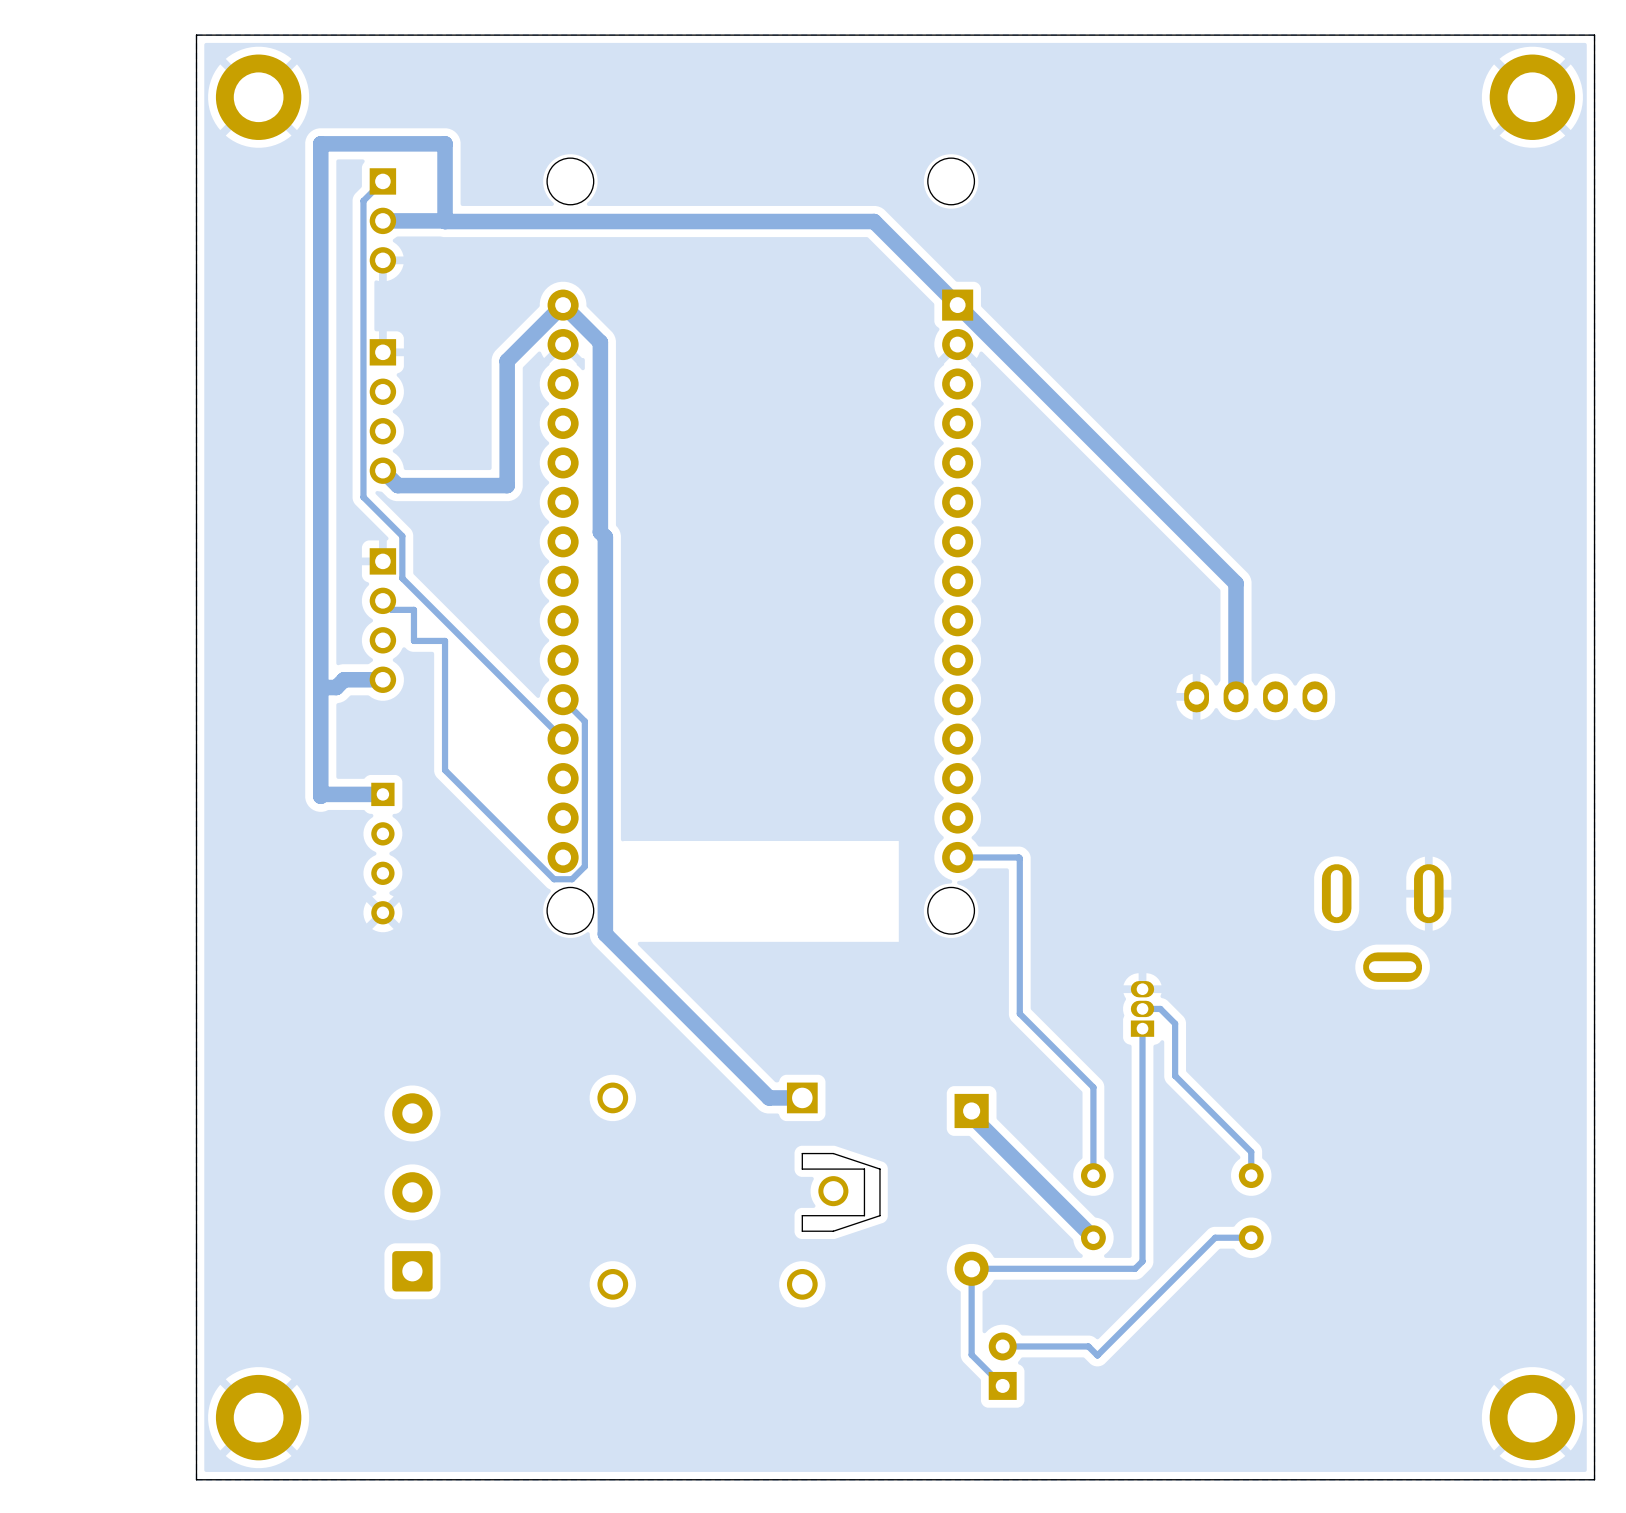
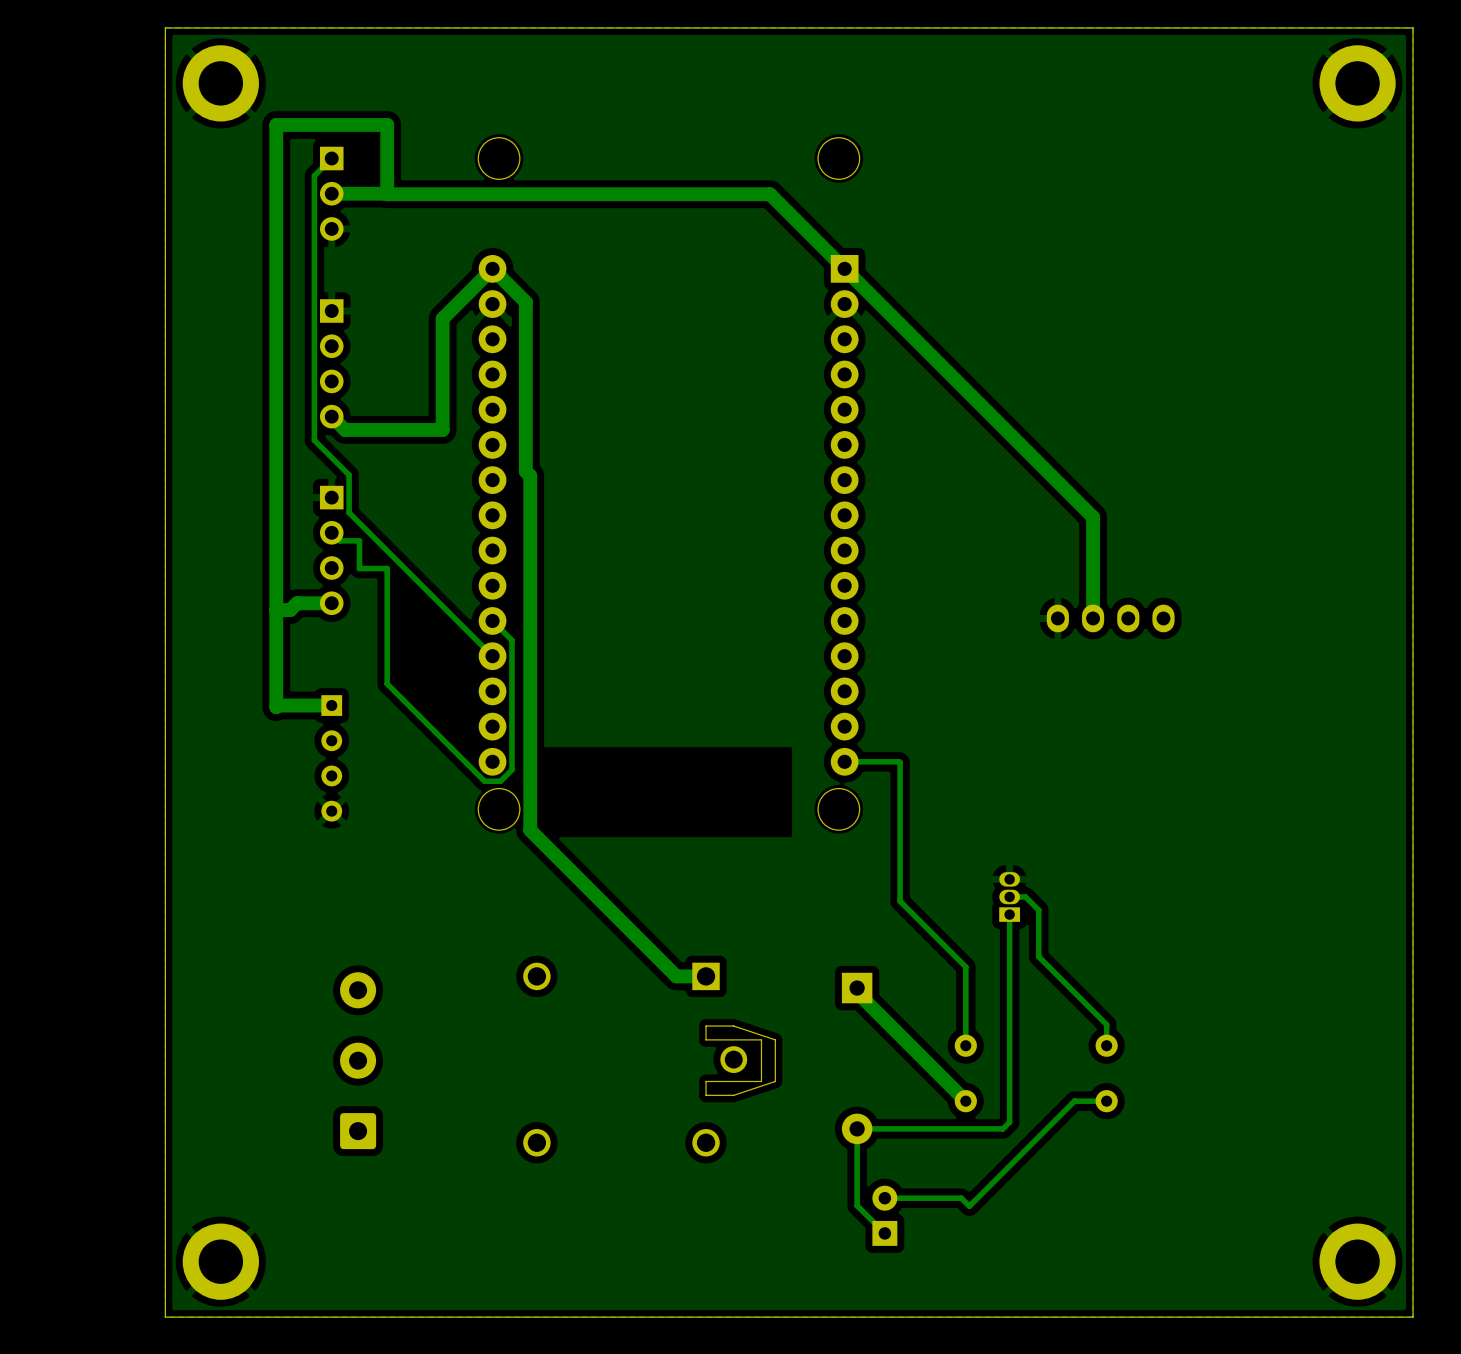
part: (1382, 923) -> none

